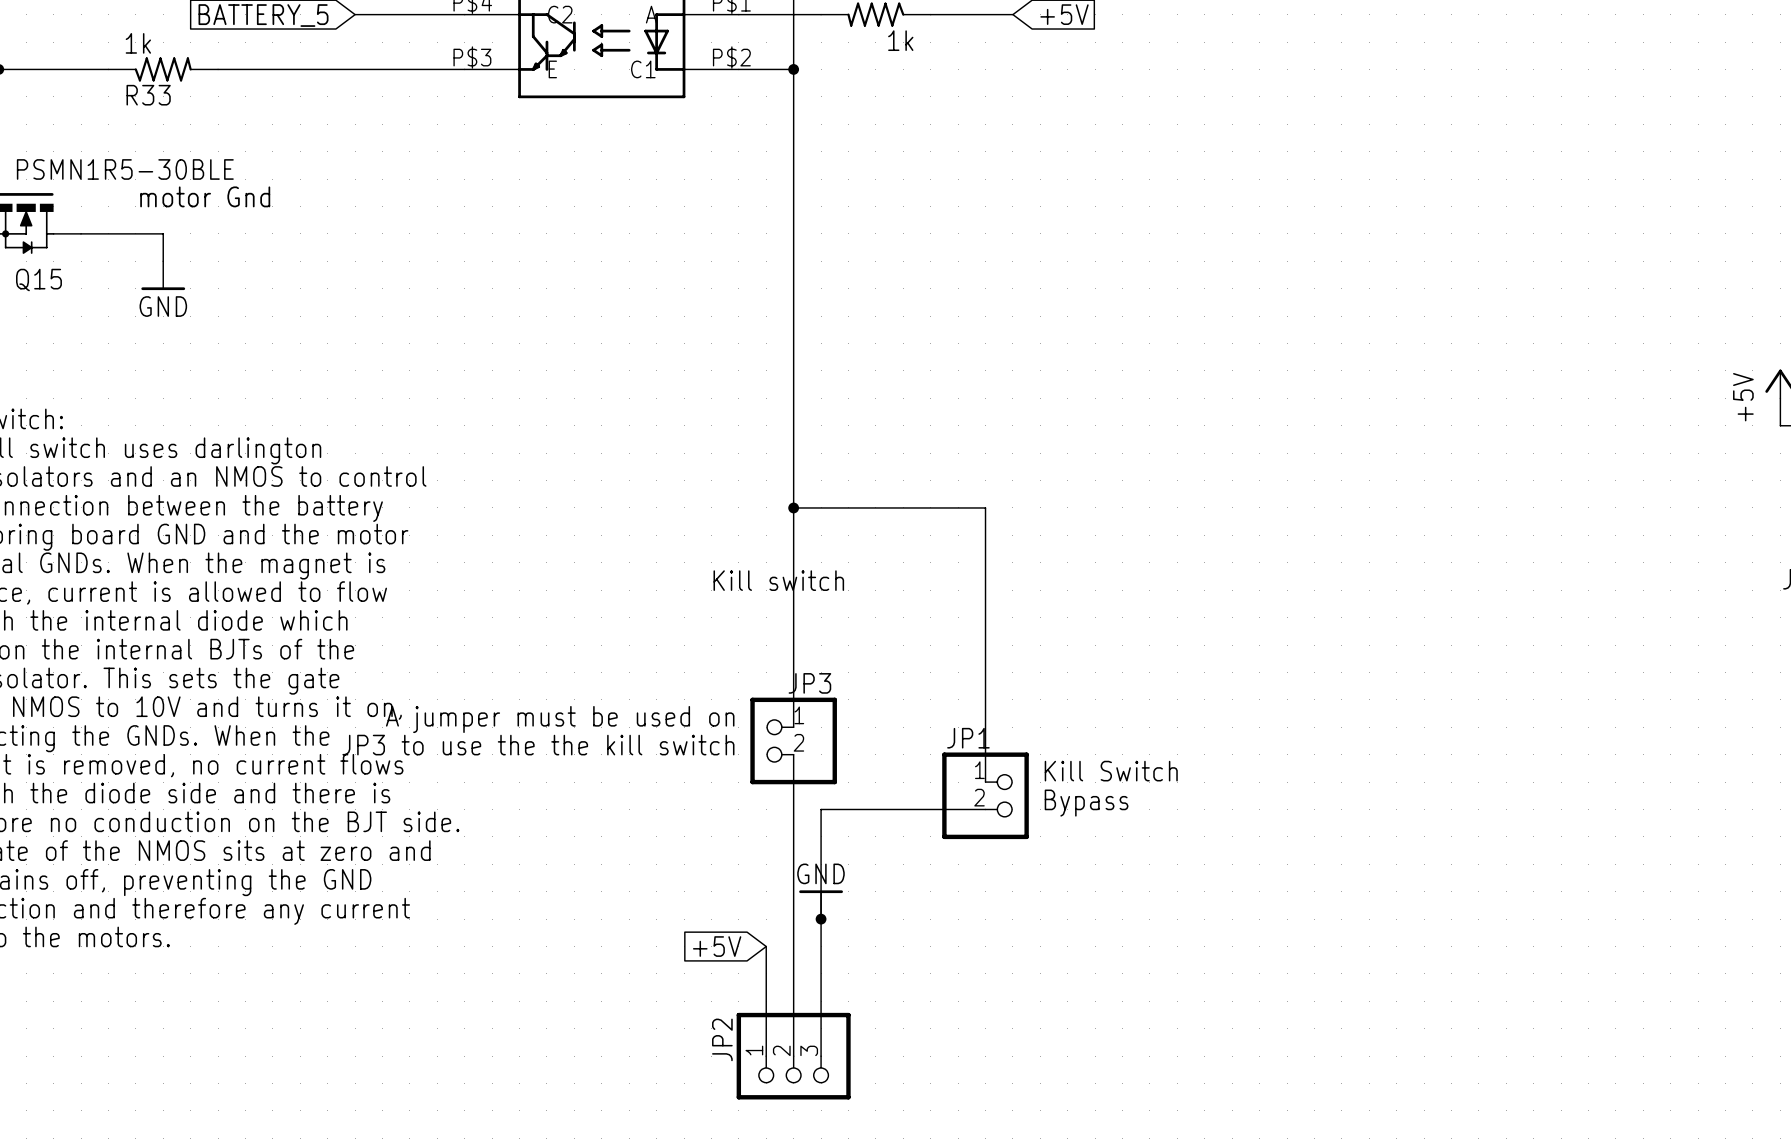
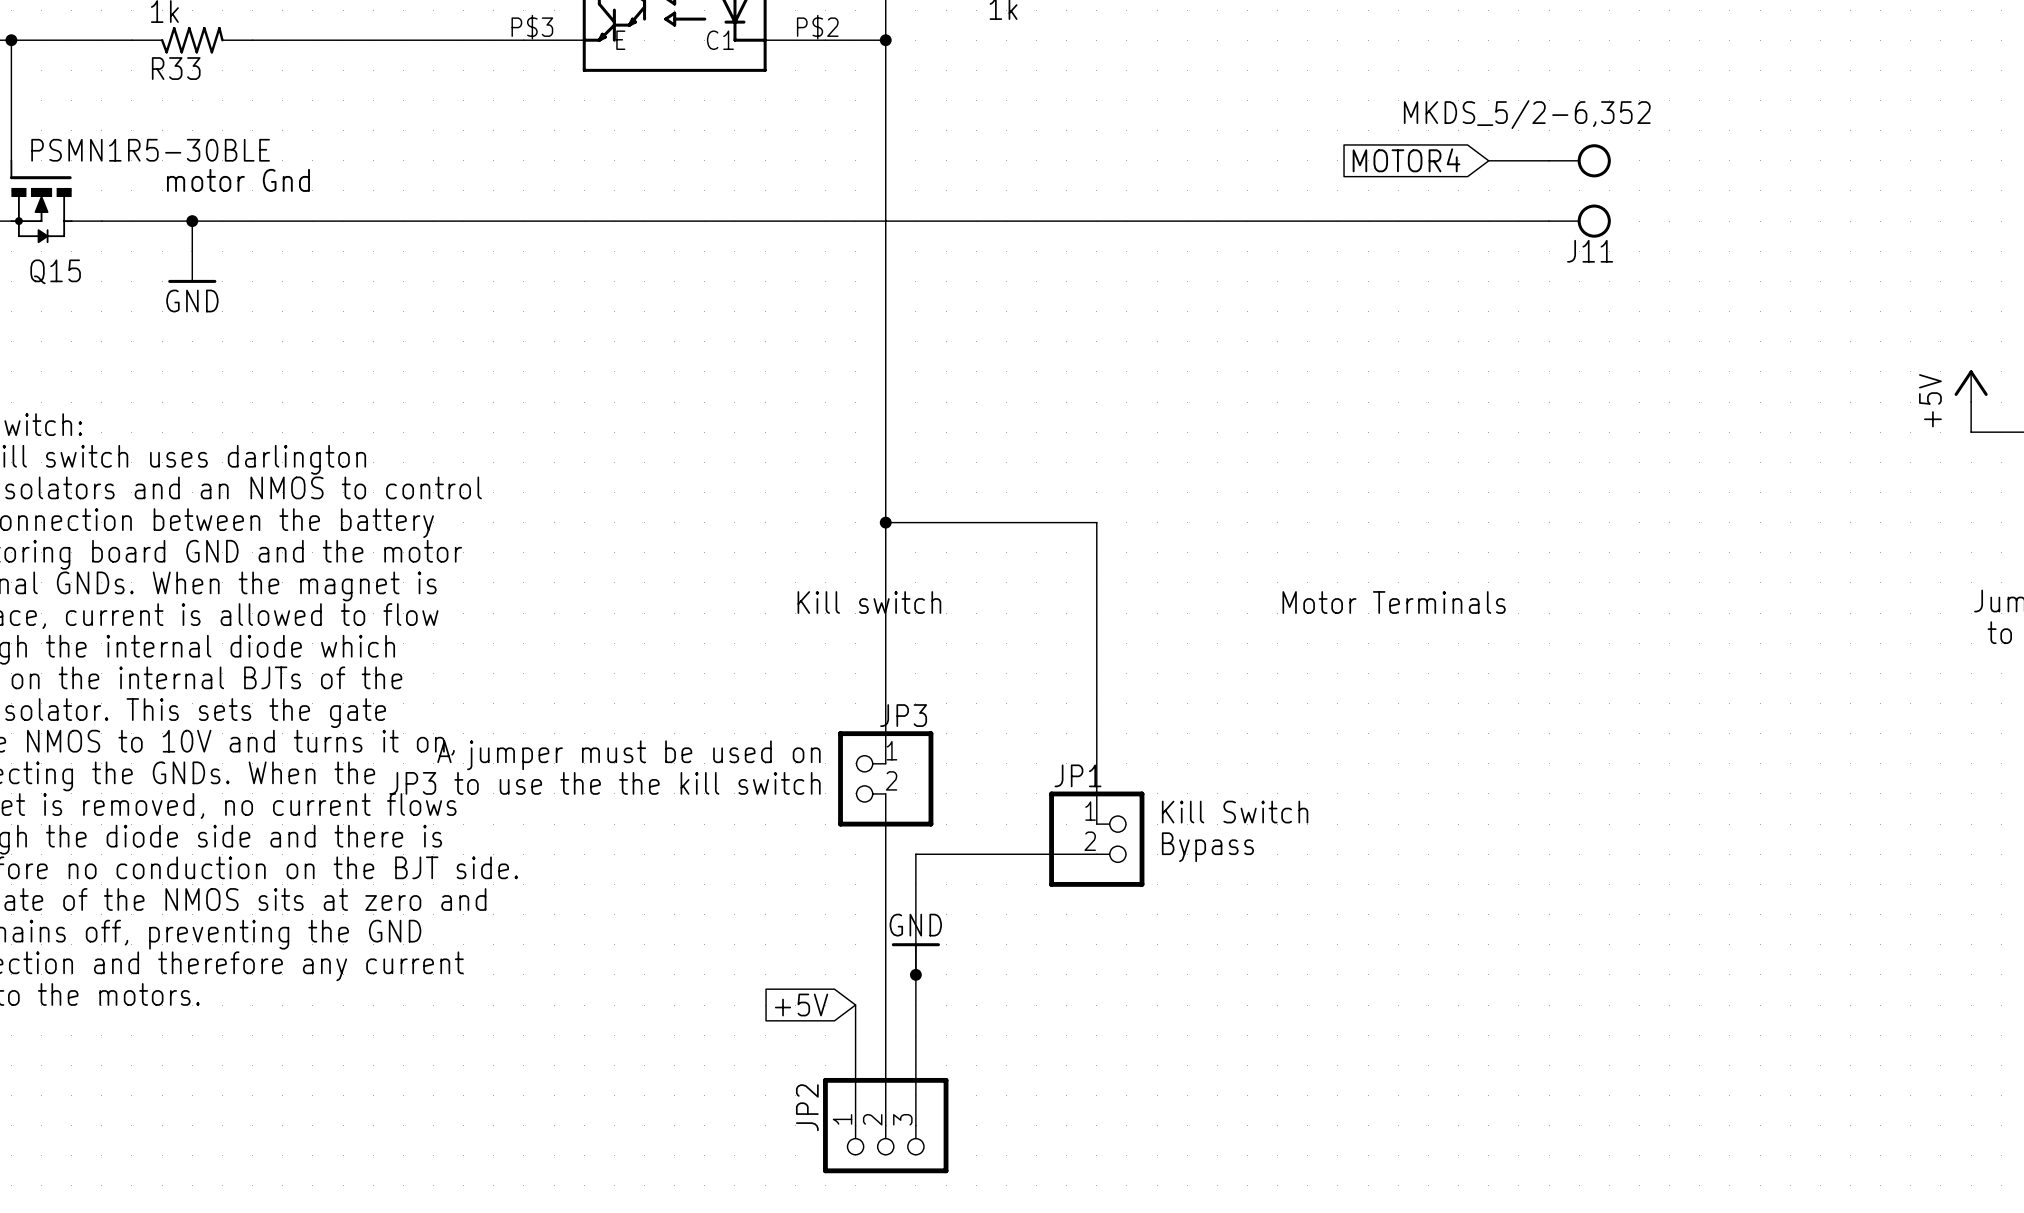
global label: none -> MOTOR4 (1406, 160)
wire: none -> (1488, 160) (1549, 160)
J11: none -> MKDS_5/2-6,352 (1579, 190)
wire: none -> (192, 221) (1549, 221)
junction: none -> (192, 221)
text: none -> Motor Terminals (1394, 602)

